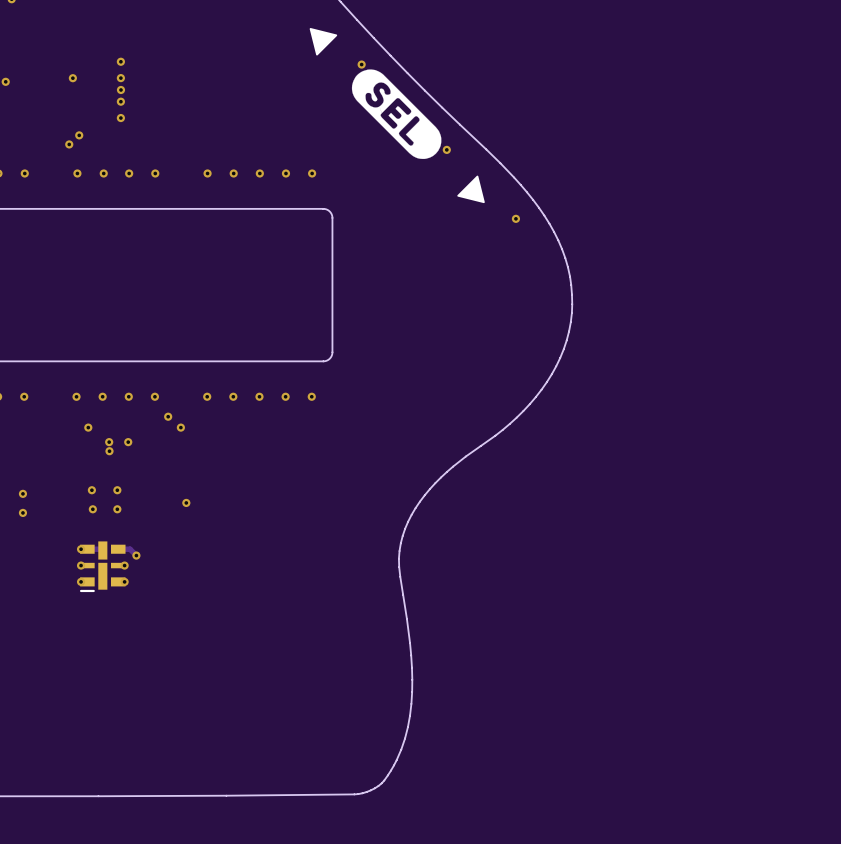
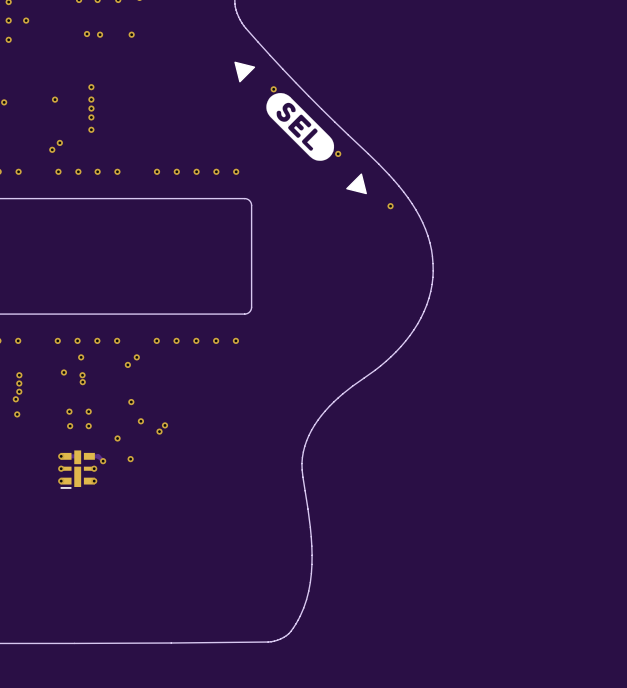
via: (168, 416) -> none
via: none -> (81, 357)
via: none -> (136, 357)
via: (88, 427) -> none
via: (180, 427) -> none
via: none -> (127, 364)
via: none -> (63, 372)
via: none -> (19, 375)
via: (128, 442) -> none
via: none -> (19, 383)
via: none -> (19, 391)
via: none -> (15, 399)
via: none -> (131, 402)
via: none -> (164, 425)
via: (22, 512) -> none
via: none -> (159, 431)
via: none -> (117, 438)
via: none -> (130, 459)

